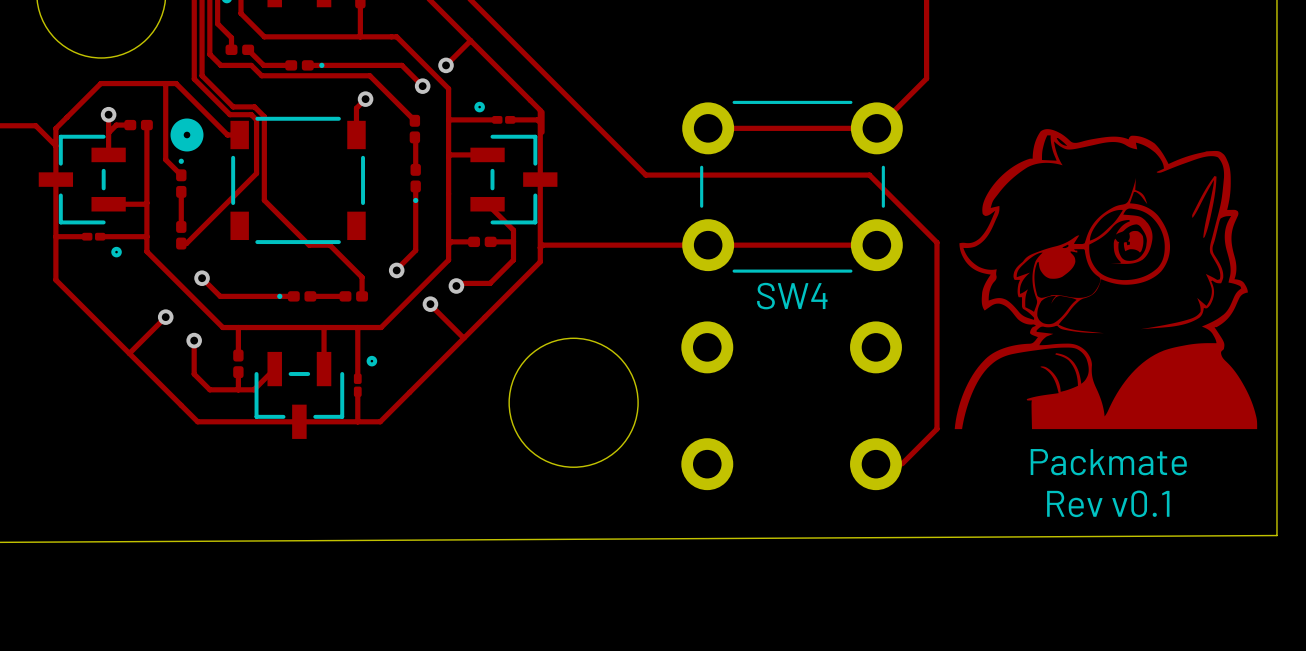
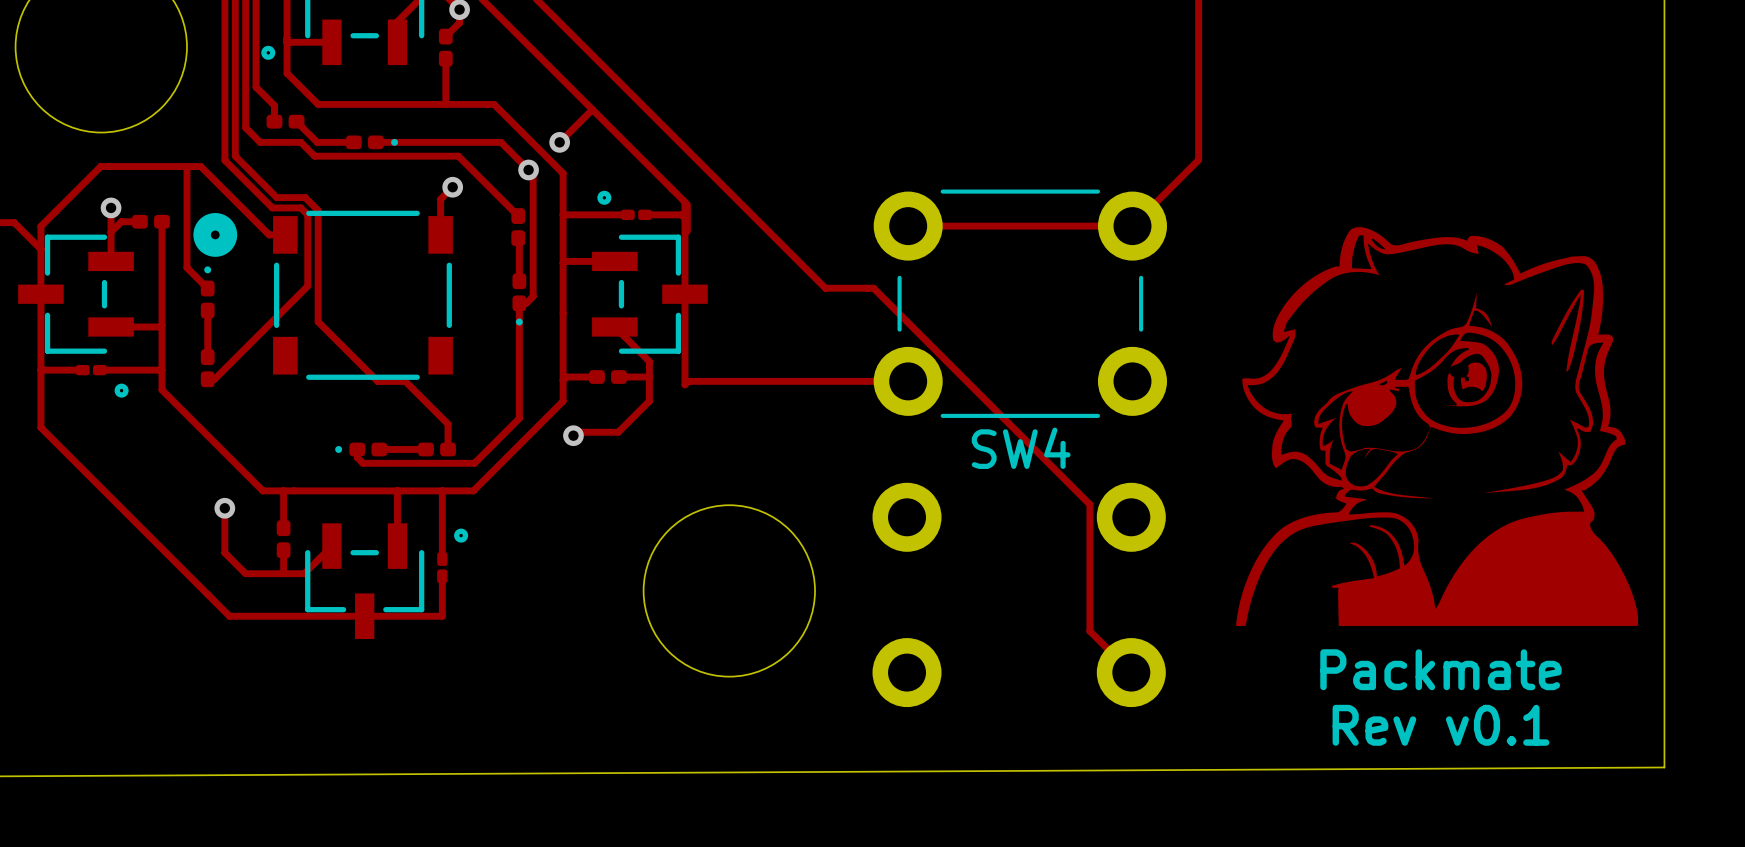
track: none -> (528, 169) (533, 174) (533, 296) (526, 303) (519, 303)
track: (682, 175) (869, 175) (936, 242) (936, 429) (902, 463) -> (873, 288) (1089, 504) (1089, 631) (1131, 672)
track: (708, 245) (876, 245) -> none
track: (540, 247) (540, 261) (380, 421) (357, 421) -> none
track: (415, 250) (396, 270) -> (519, 388) (519, 418) (474, 463) (363, 463) (357, 457) (357, 449)
via: (396, 270) -> none
track: (202, 278) (220, 296) (293, 296) -> none
via: (202, 278) -> none
track: (430, 304) (464, 337) -> none
via: (430, 304) -> none
track: (165, 317) (129, 353) -> none
via: (165, 317) -> none

